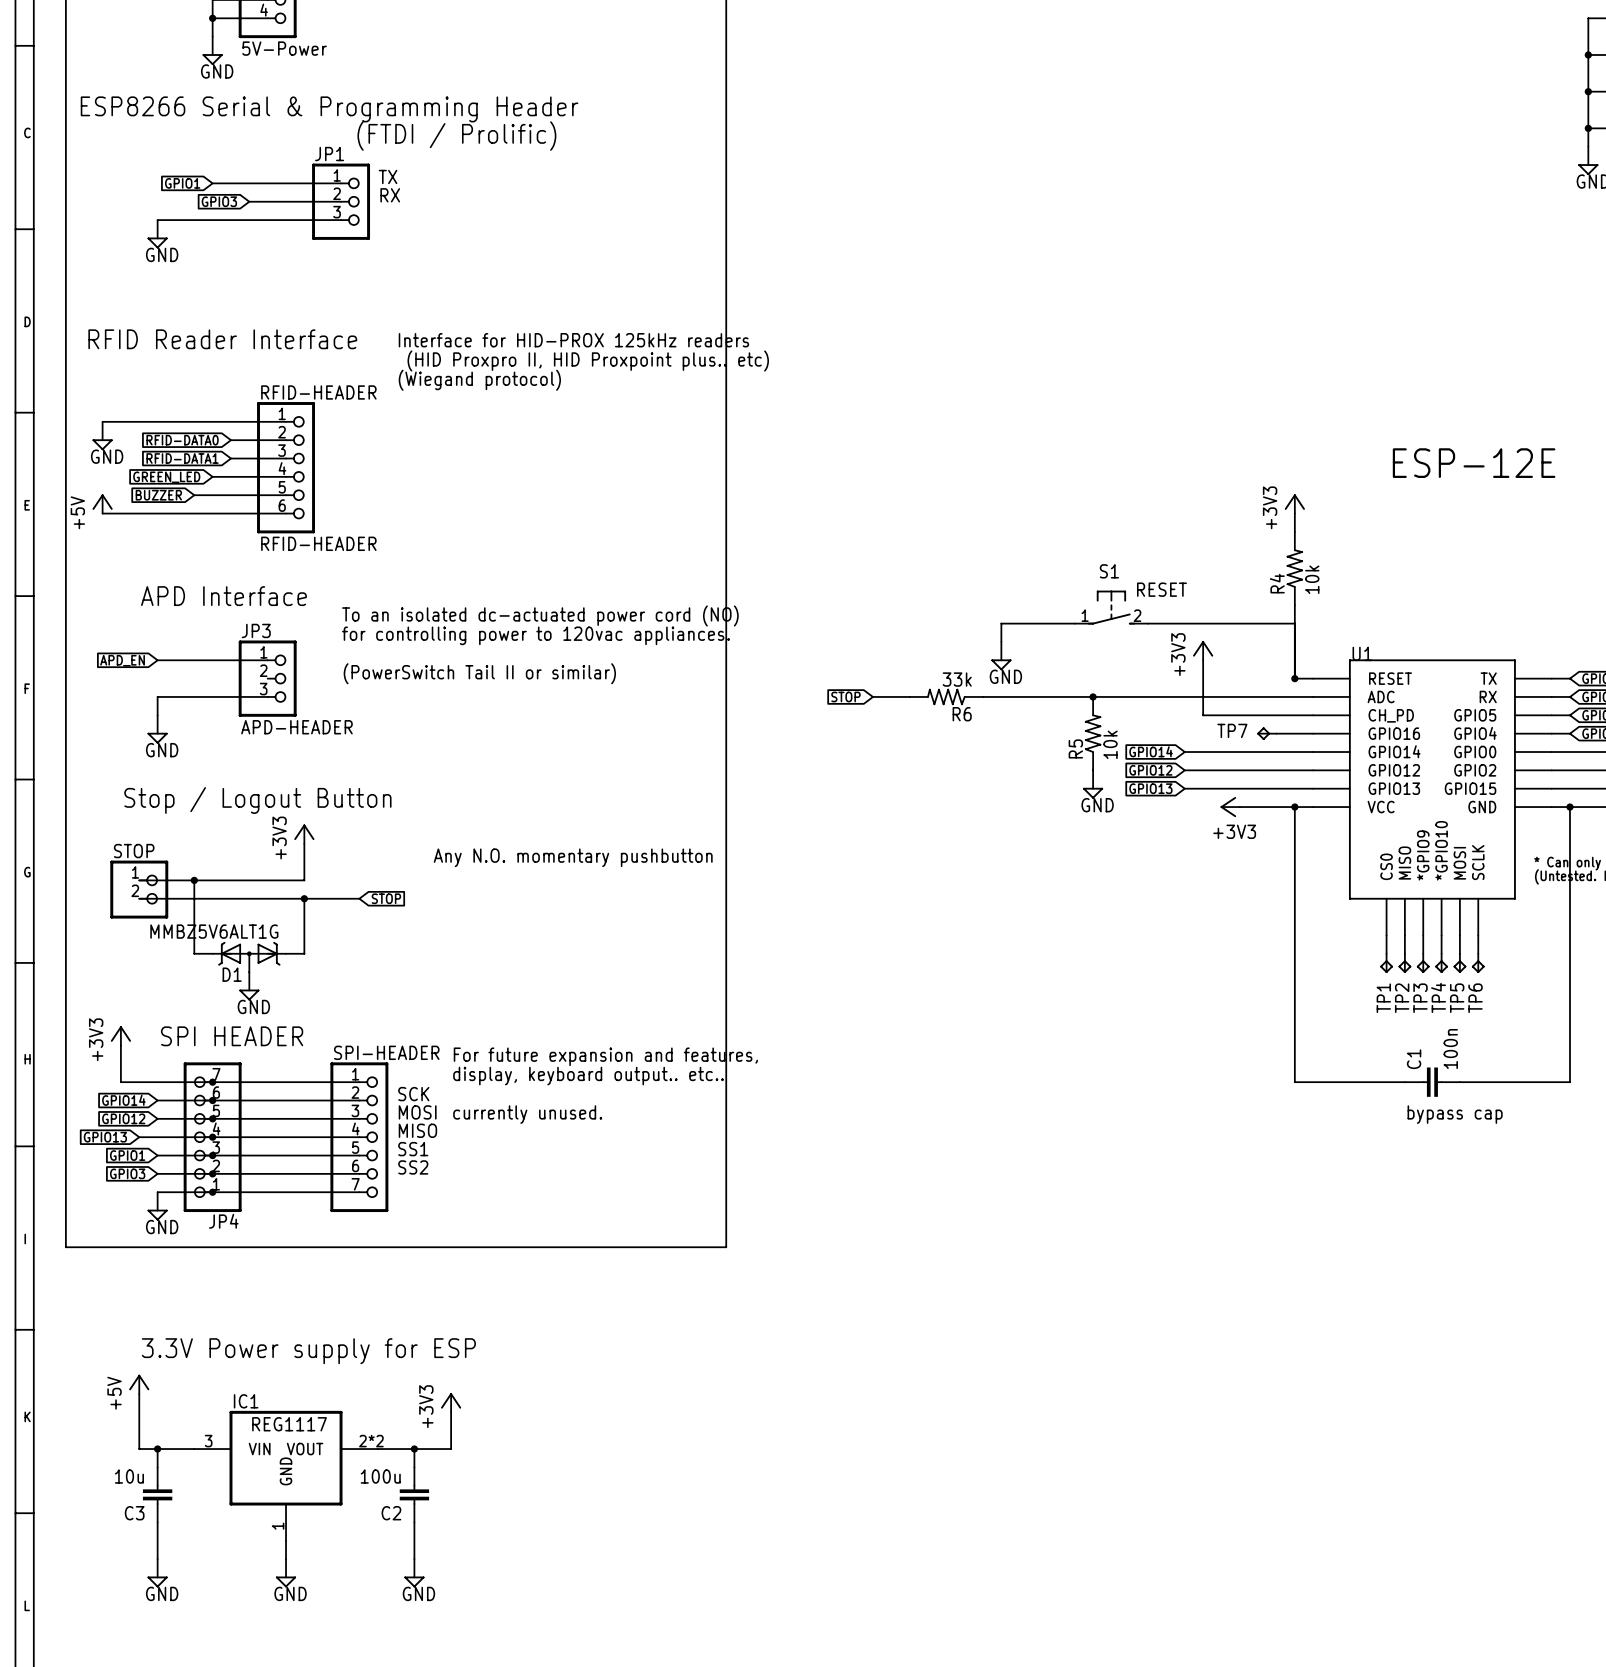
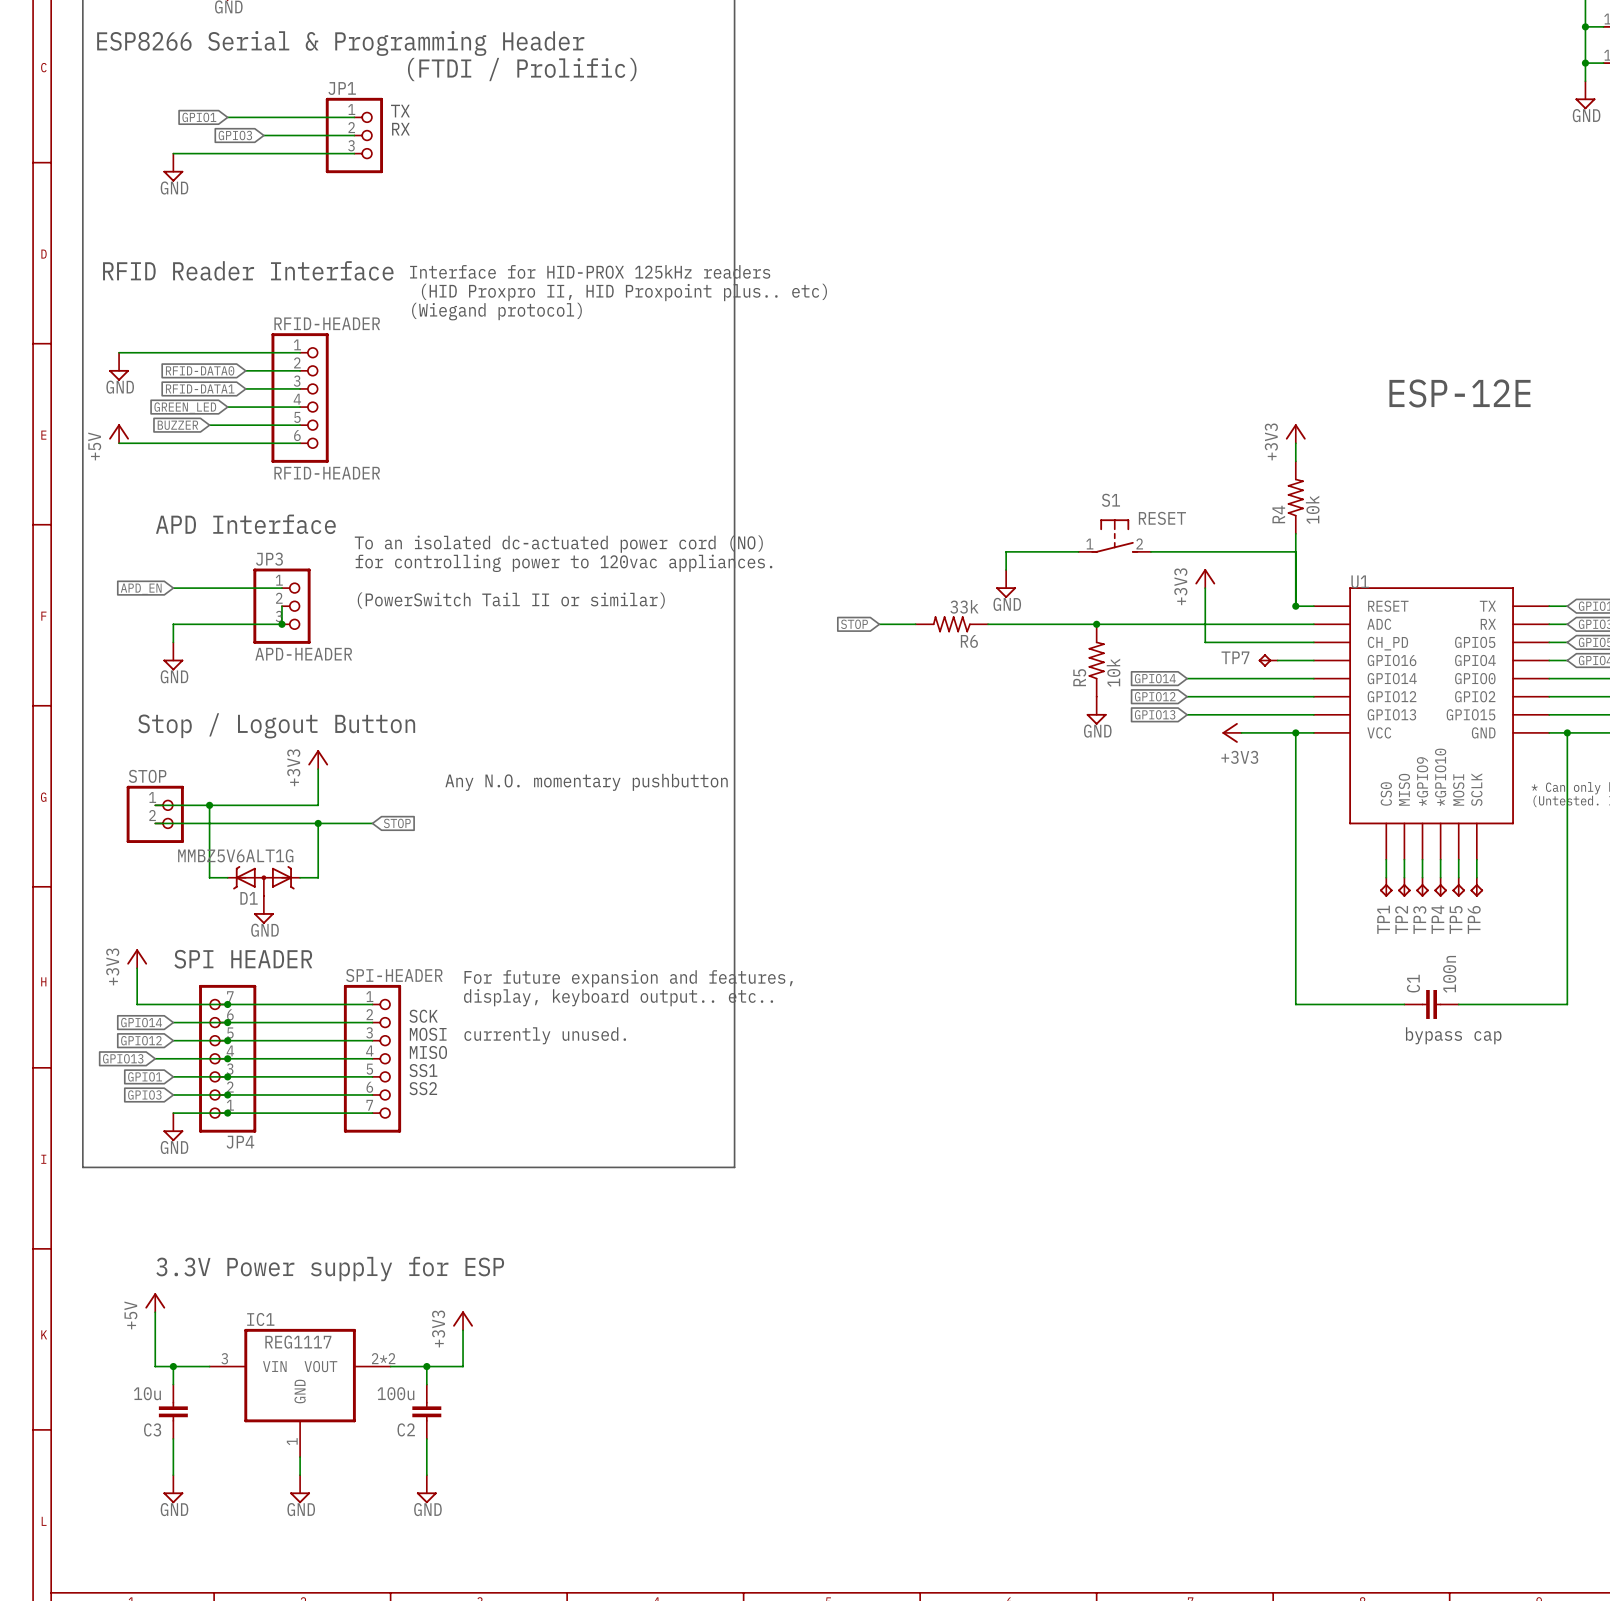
wire: none -> (281, 606) (281, 624)
junction: none -> (281, 624)

